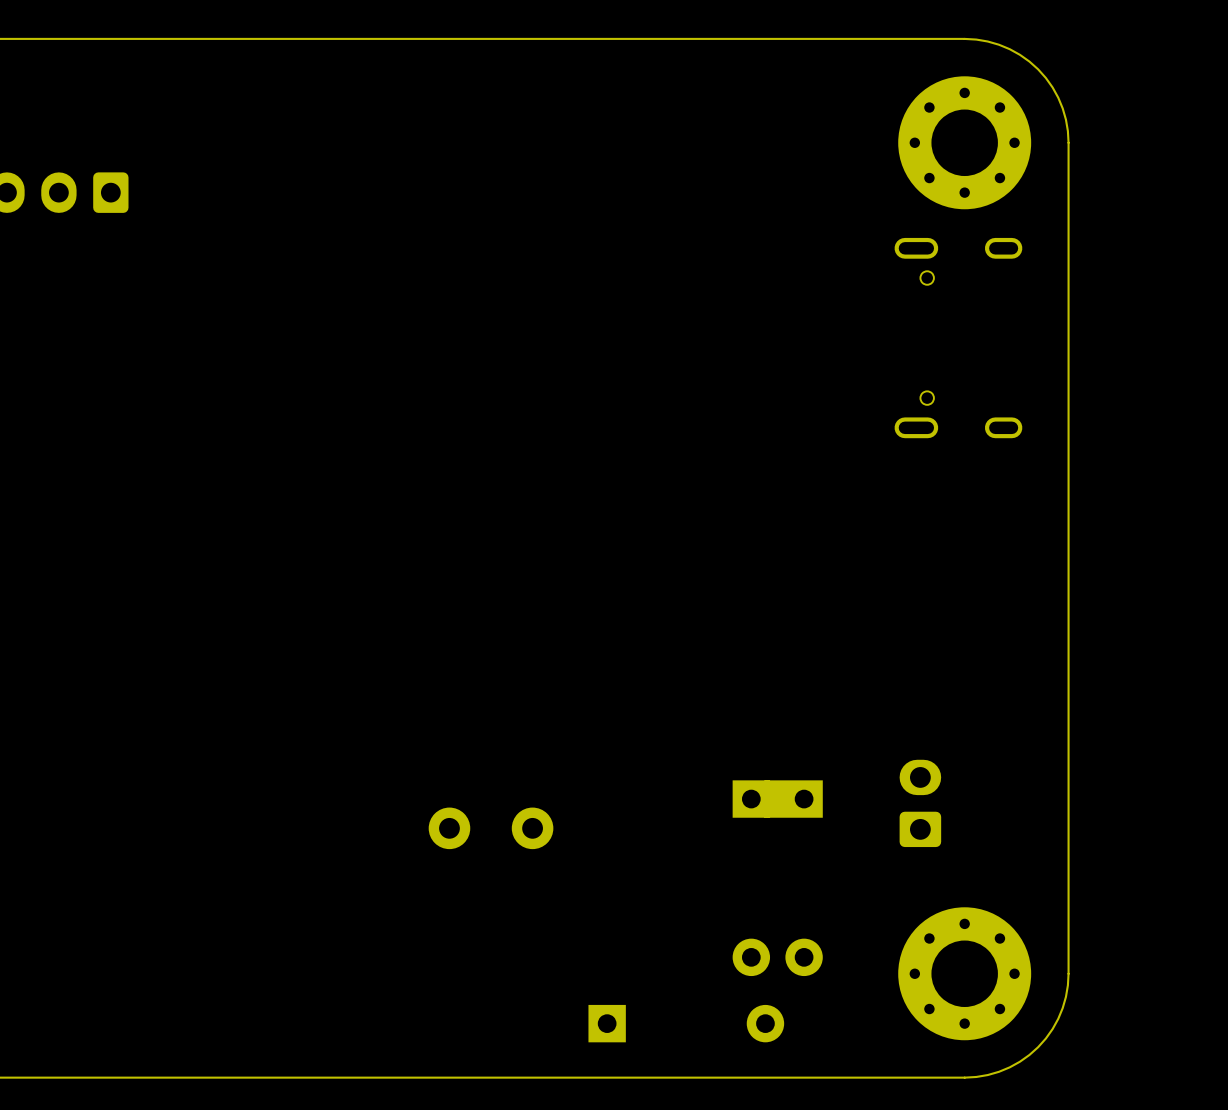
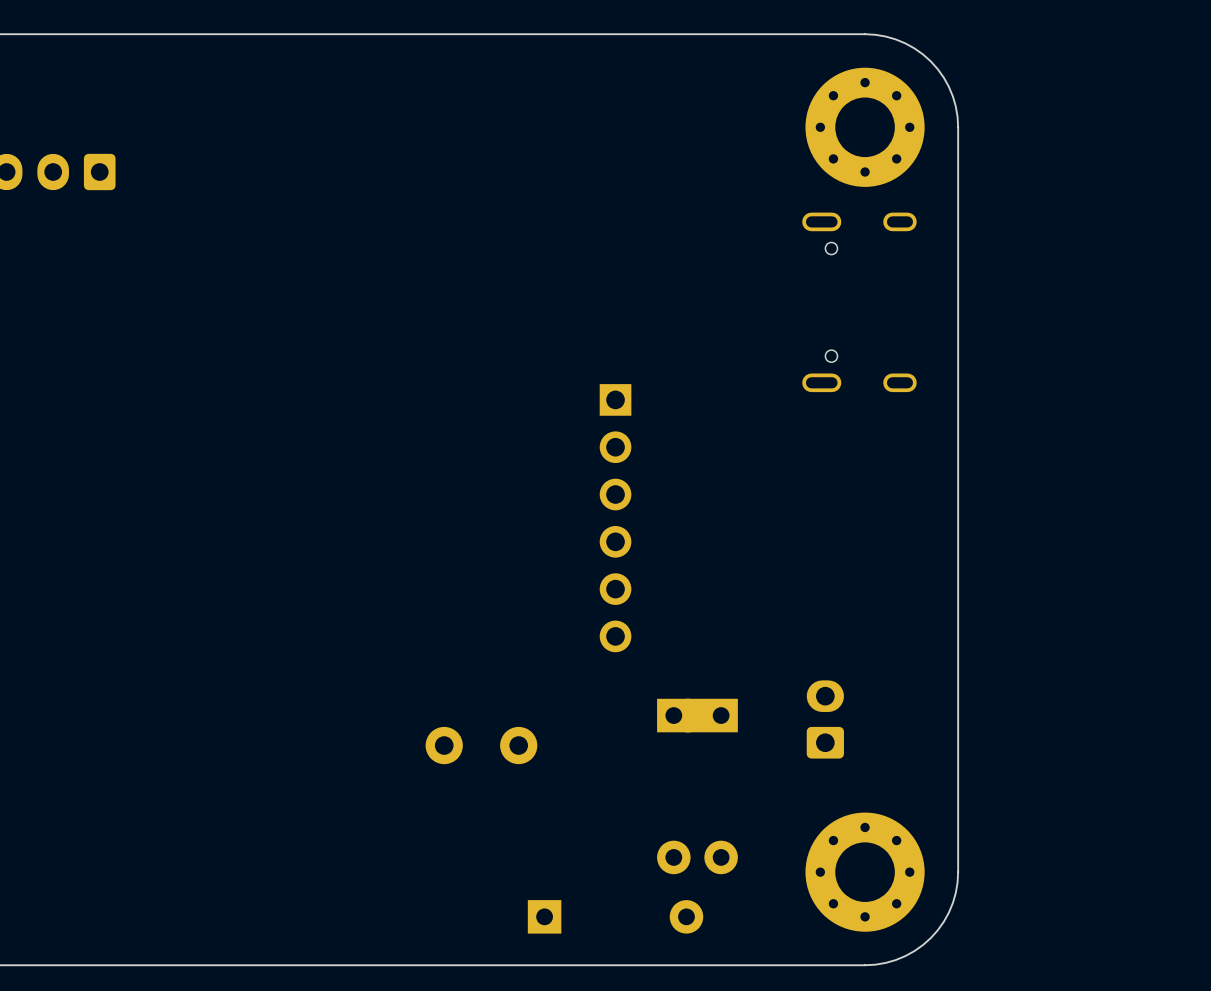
part: none -> (615, 518)
part position: (491, 828) -> (481, 745)

